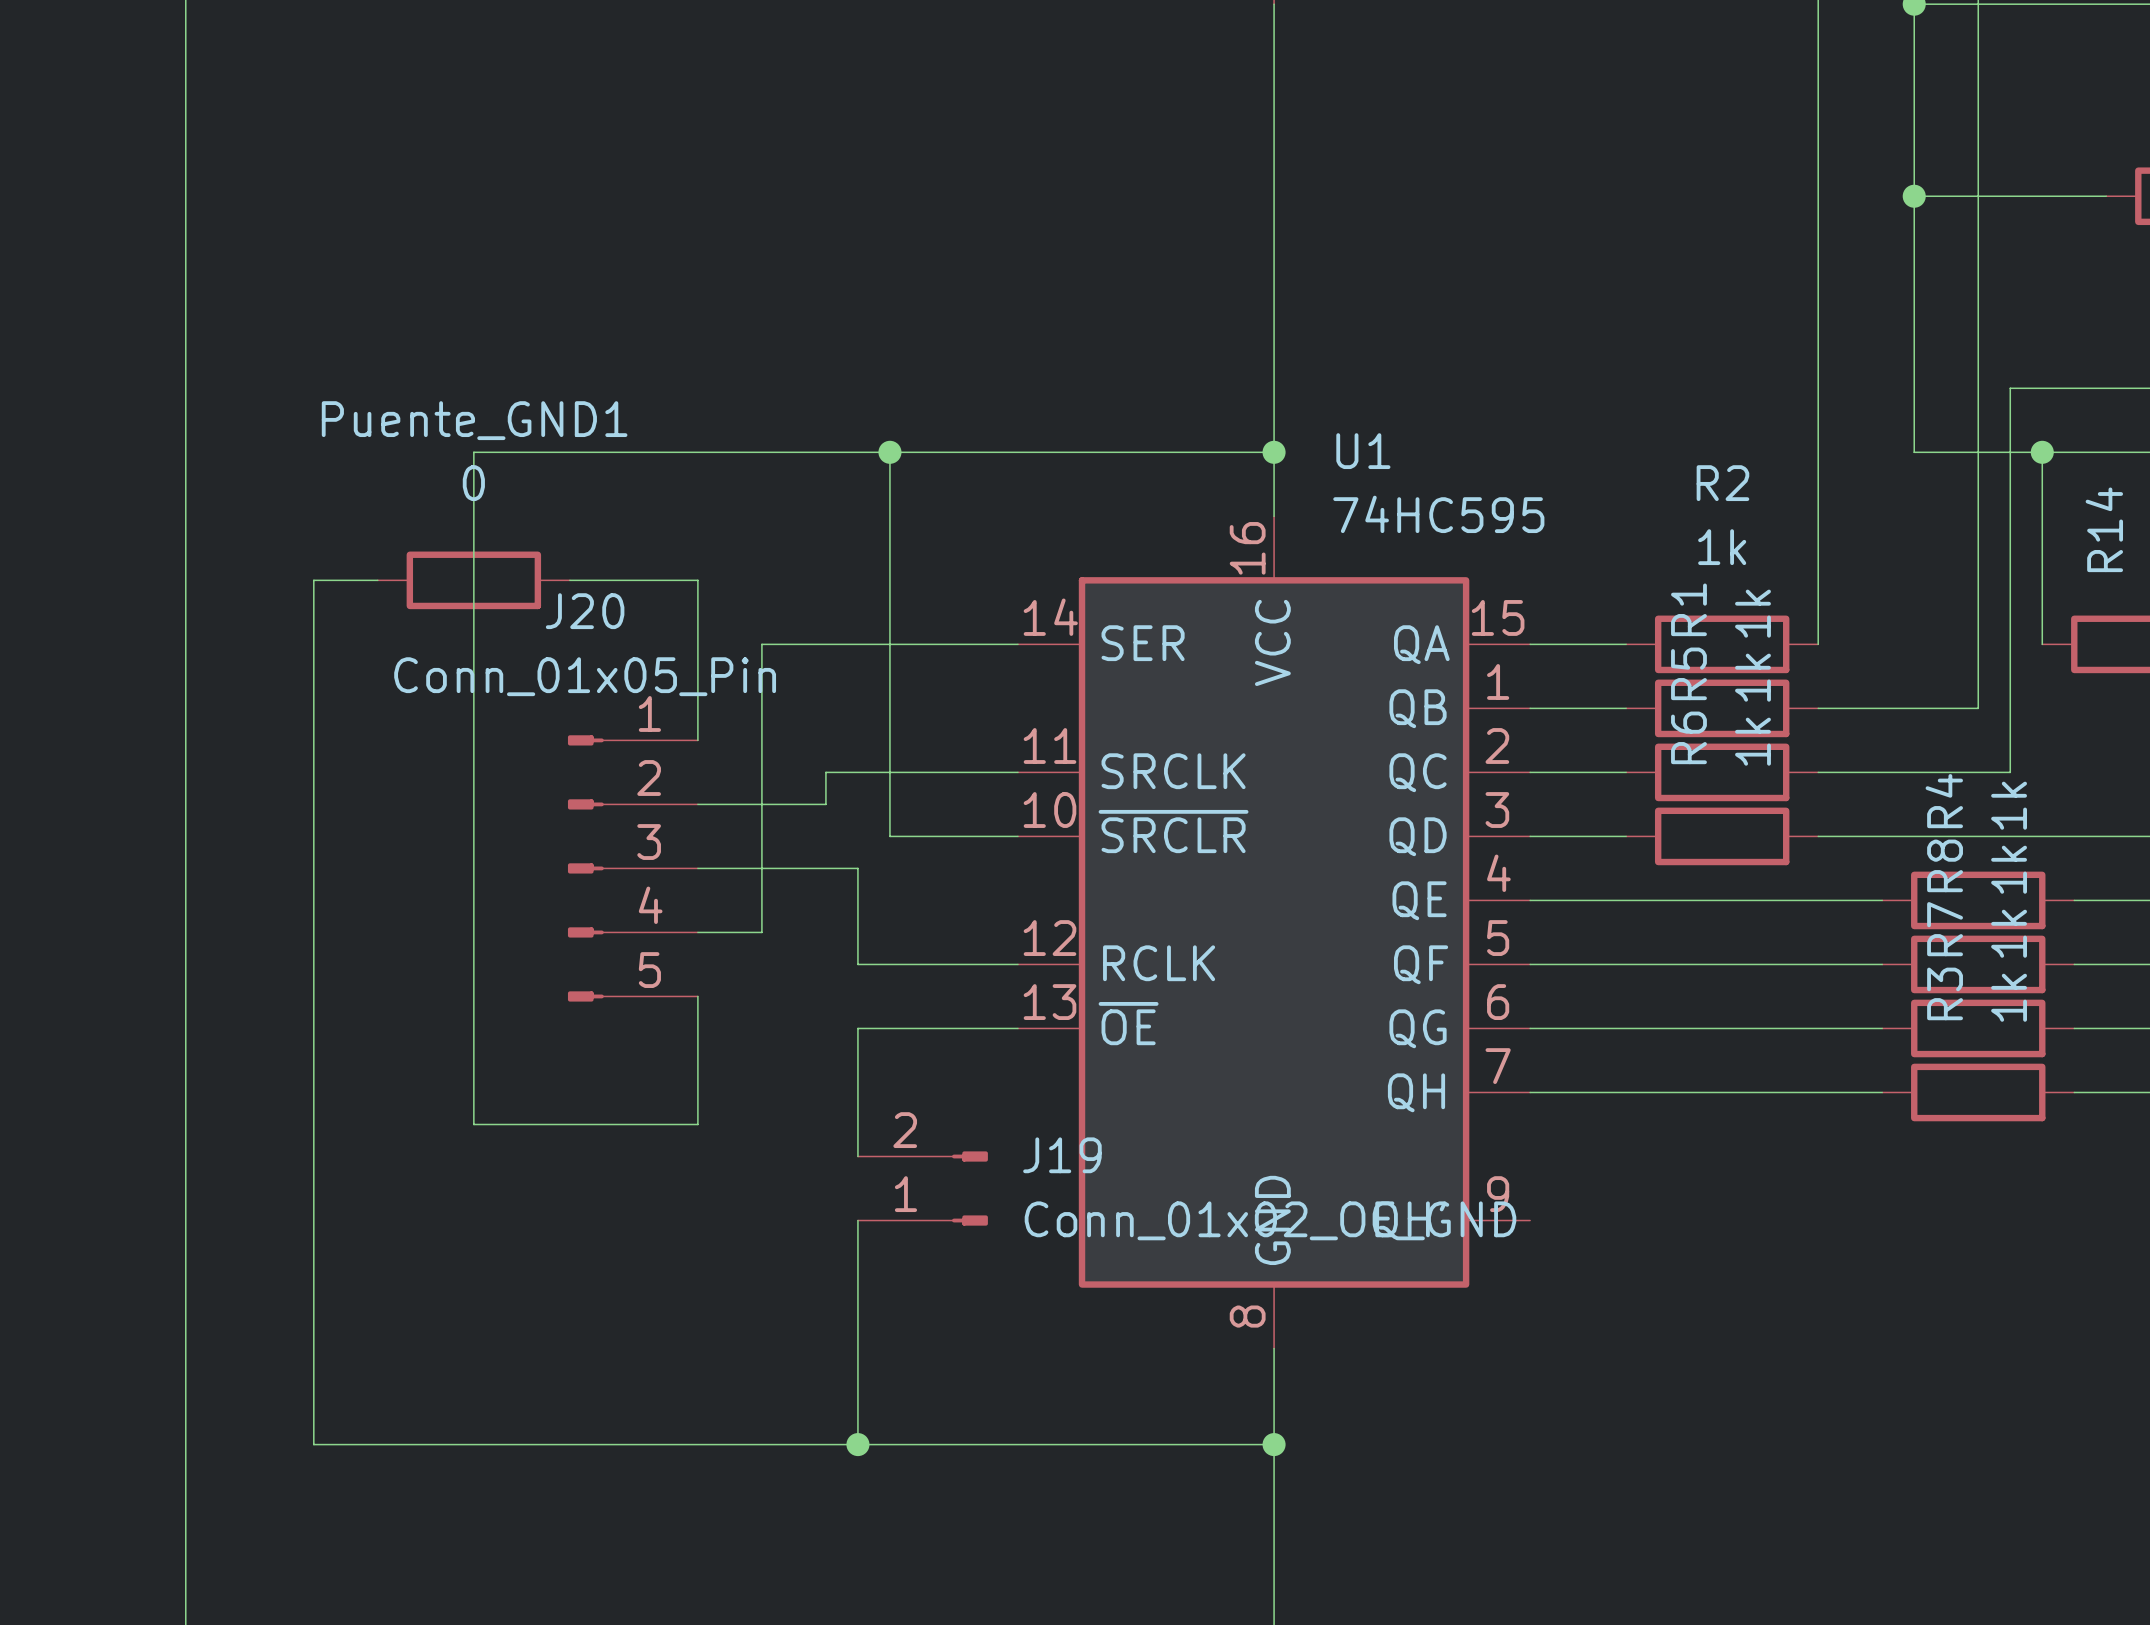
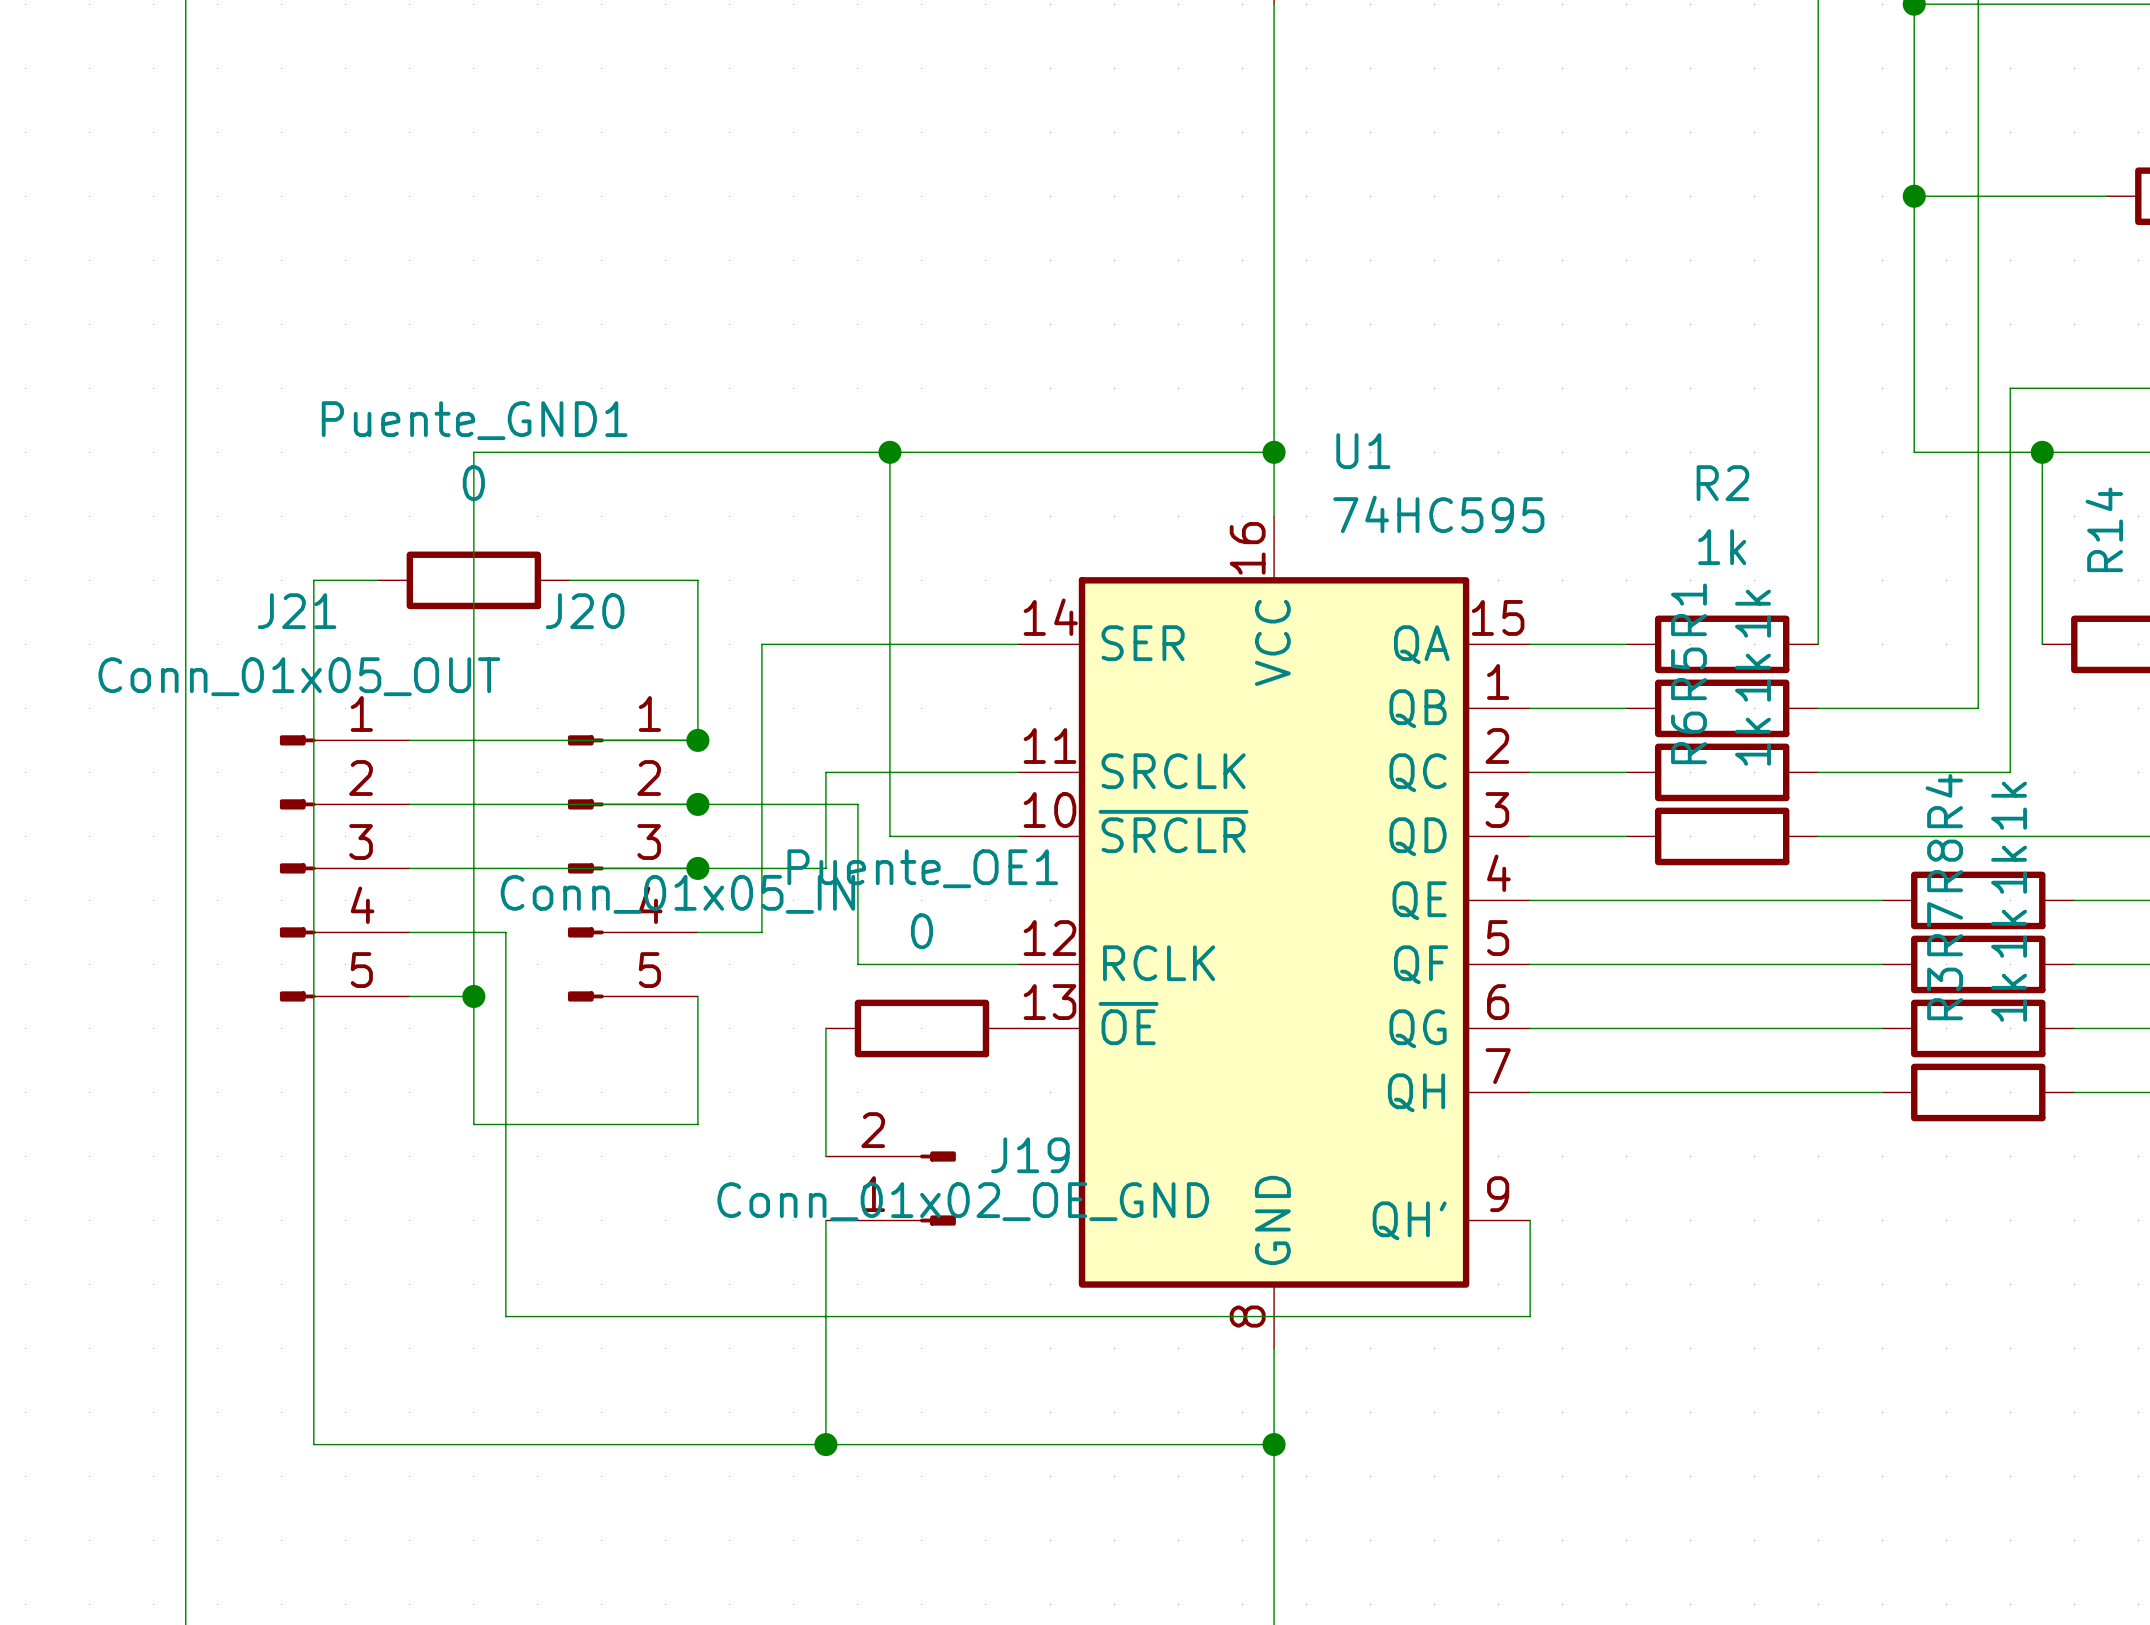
J20 value: Conn_01x05_Pin (585, 676) -> Conn_01x05_IN (677, 894)
wire: none -> (409, 740) (697, 740)
junction: none -> (697, 740)
wire: none -> (409, 804) (697, 804)
junction: none -> (697, 804)
J21: none -> Conn_01x05_OUT (344, 868)
wire: none -> (409, 868) (697, 868)
junction: none -> (697, 868)
wire: (825, 868) (857, 868) -> (825, 868) (825, 804) (857, 804) (857, 868)
wire: none -> (409, 932) (505, 932) (505, 1316) (1530, 1316) (1530, 1220)
wire: none -> (409, 996) (473, 996)
junction: none -> (473, 996)
wire: none -> (825, 1028) (825, 1156)
Puente_OE1: none -> 0 (921, 1028)
wire: (1017, 1028) (857, 1028) (857, 1156) -> none
J19 position: (922, 1188) -> (890, 1188)
wire: (857, 1220) (857, 1444) -> (825, 1220) (825, 1444)
J19 value position: Conn_01x02_OE_GND (1270, 1220) -> Conn_01x02_OE_GND (963, 1201)
junction position: (857, 1444) -> (825, 1444)

